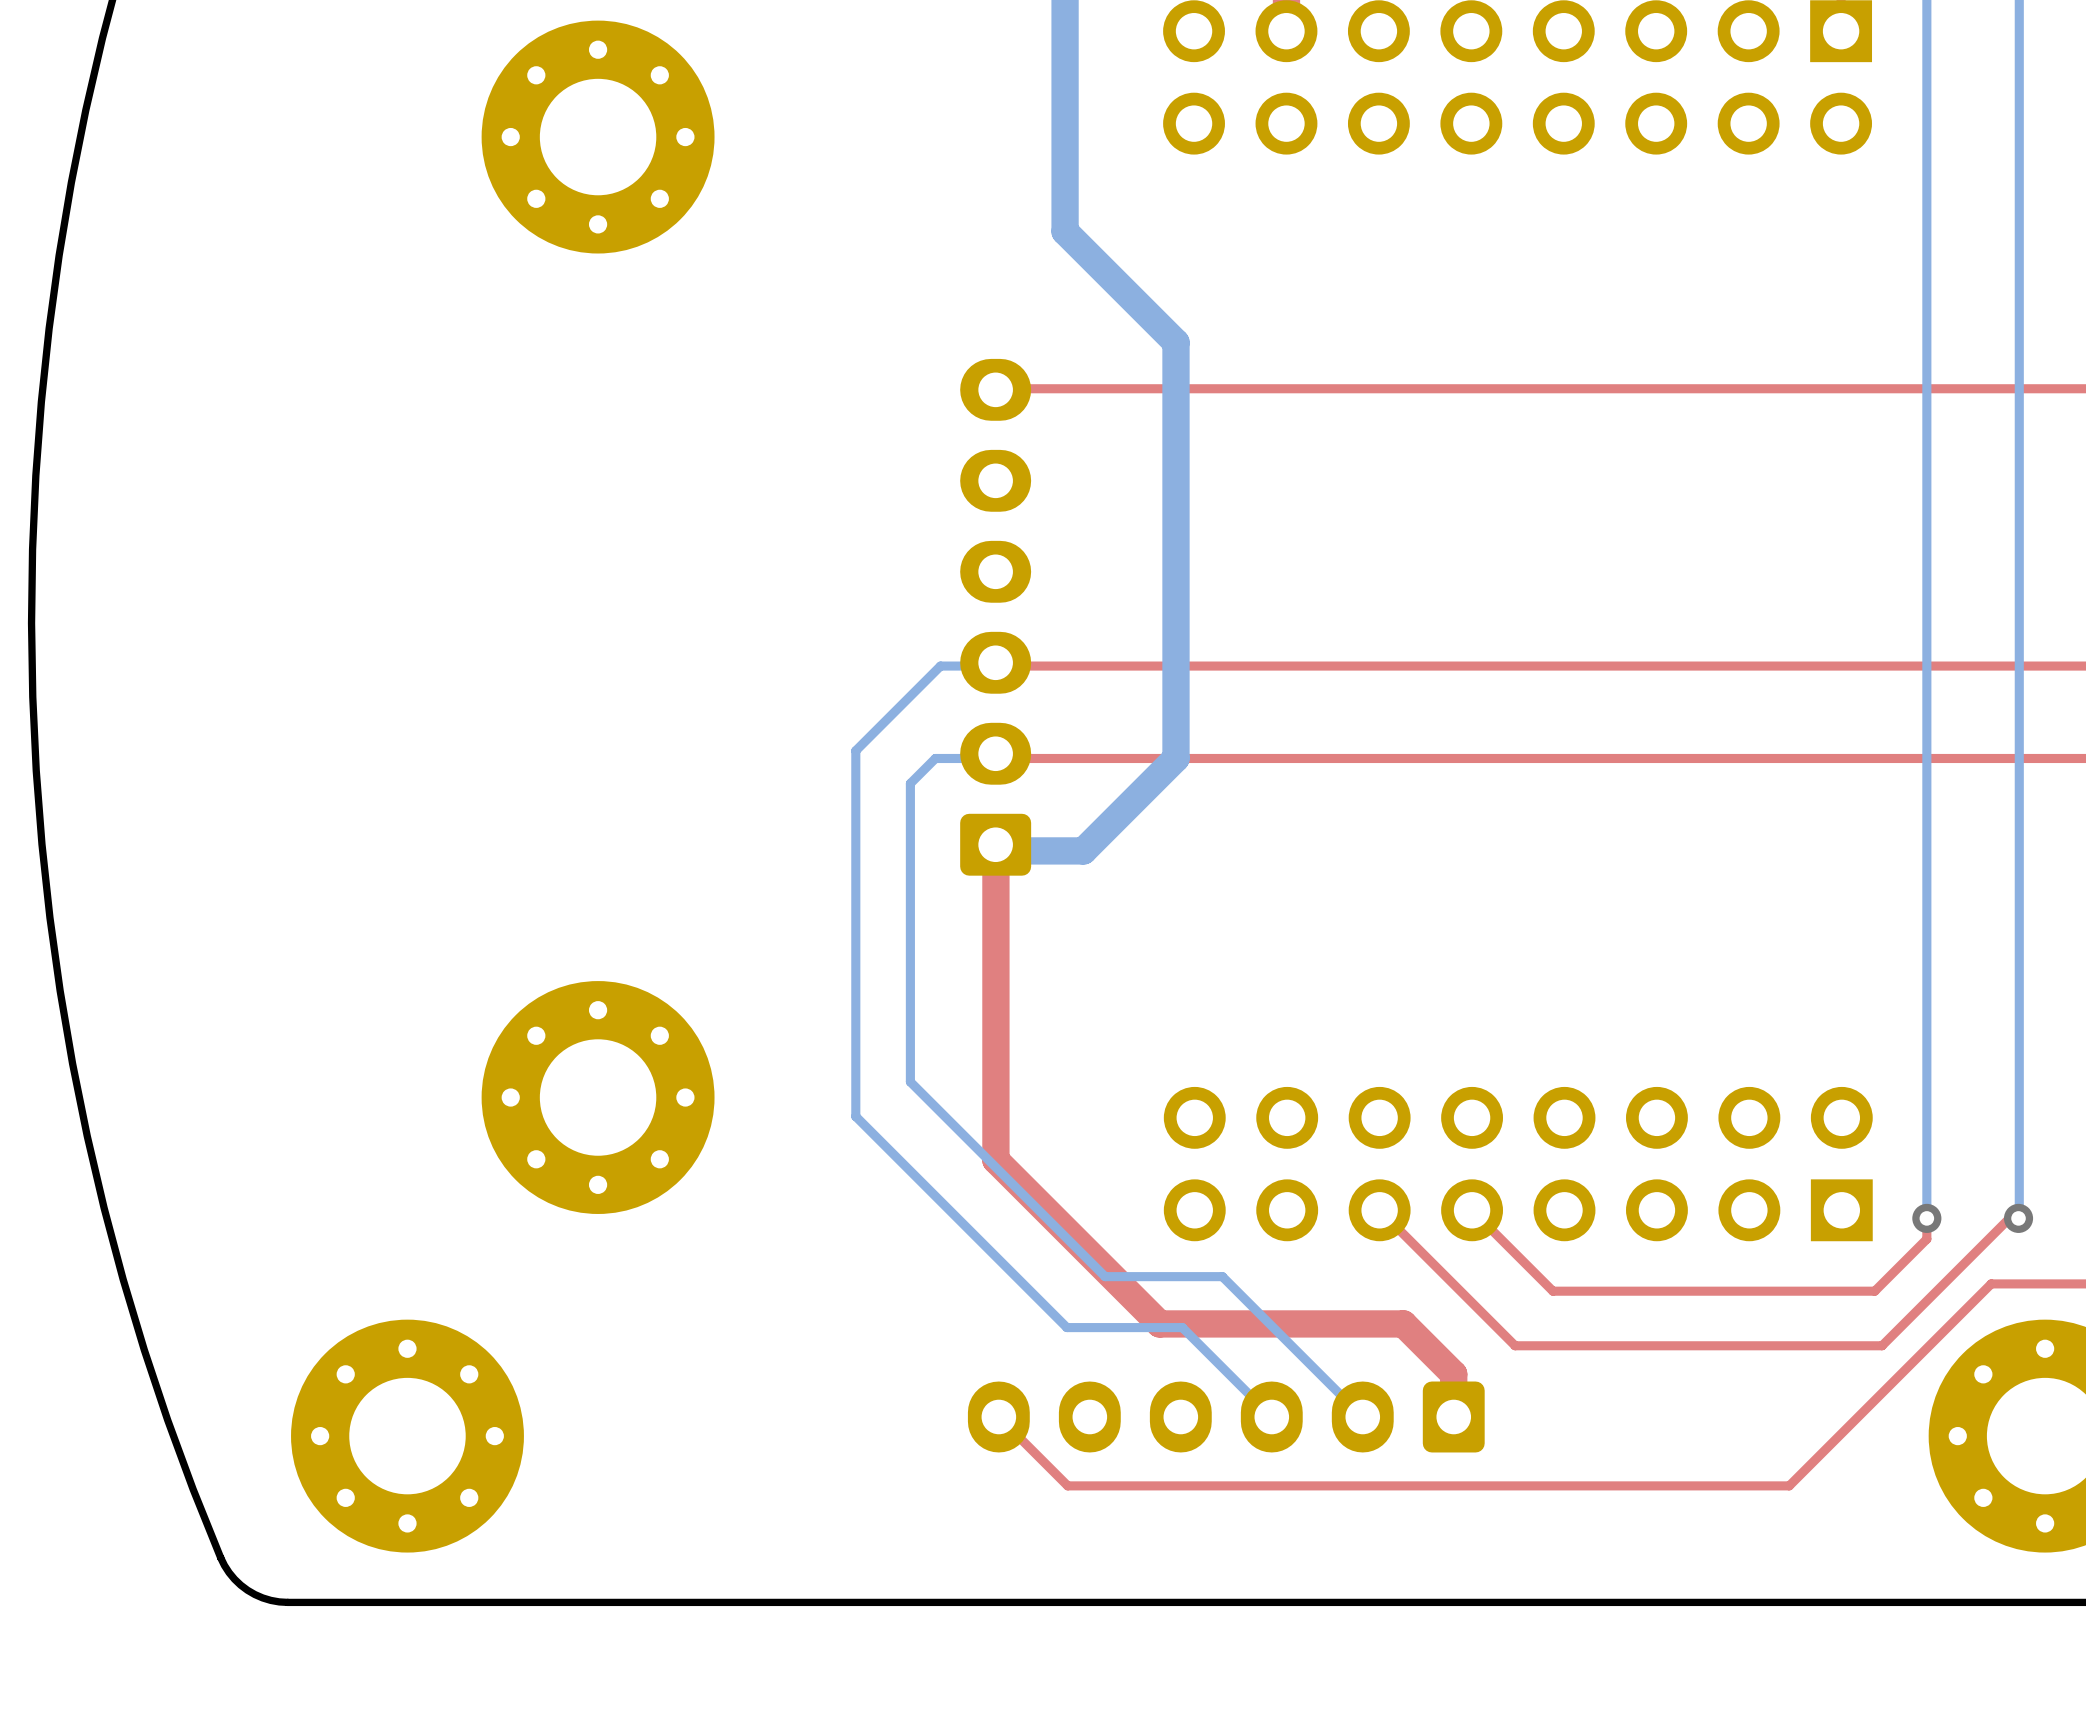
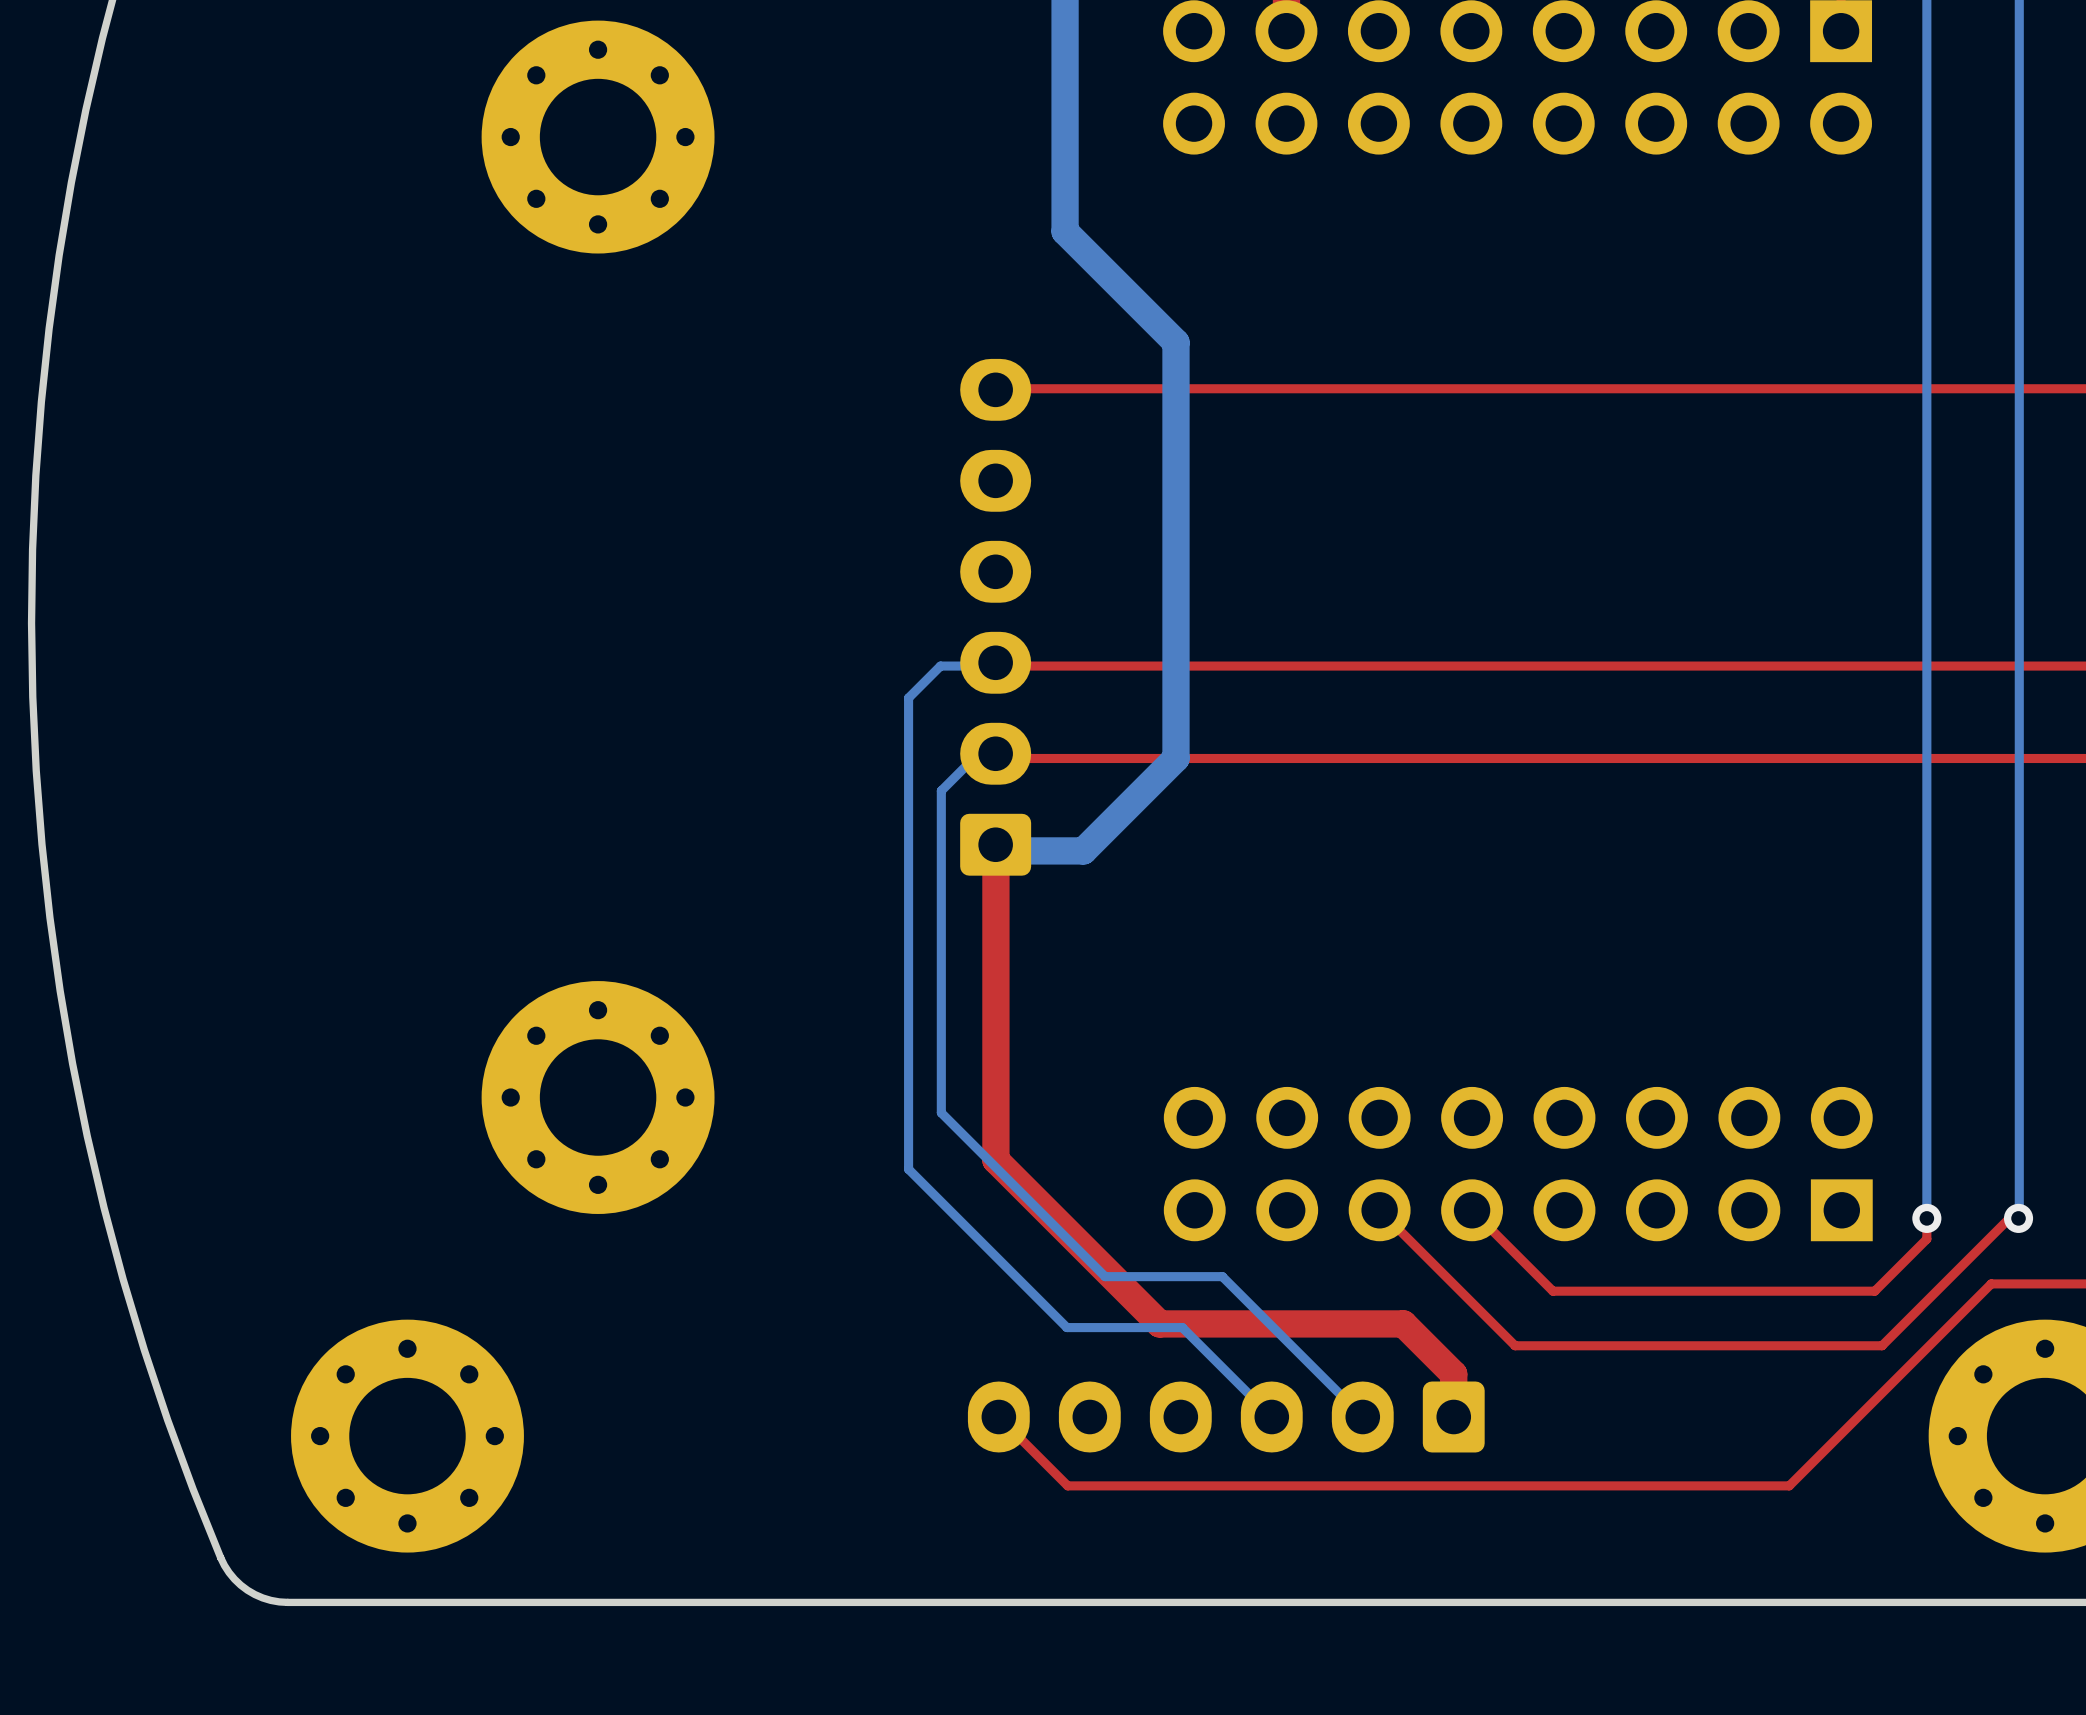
bottom track: (908, 698) (855, 750) (855, 1116) (908, 1169) -> (908, 698) (908, 1169)
bottom track: (973, 758) (935, 758) (910, 783) (910, 1081) (941, 1112) -> (973, 758) (941, 790) (941, 1112)

